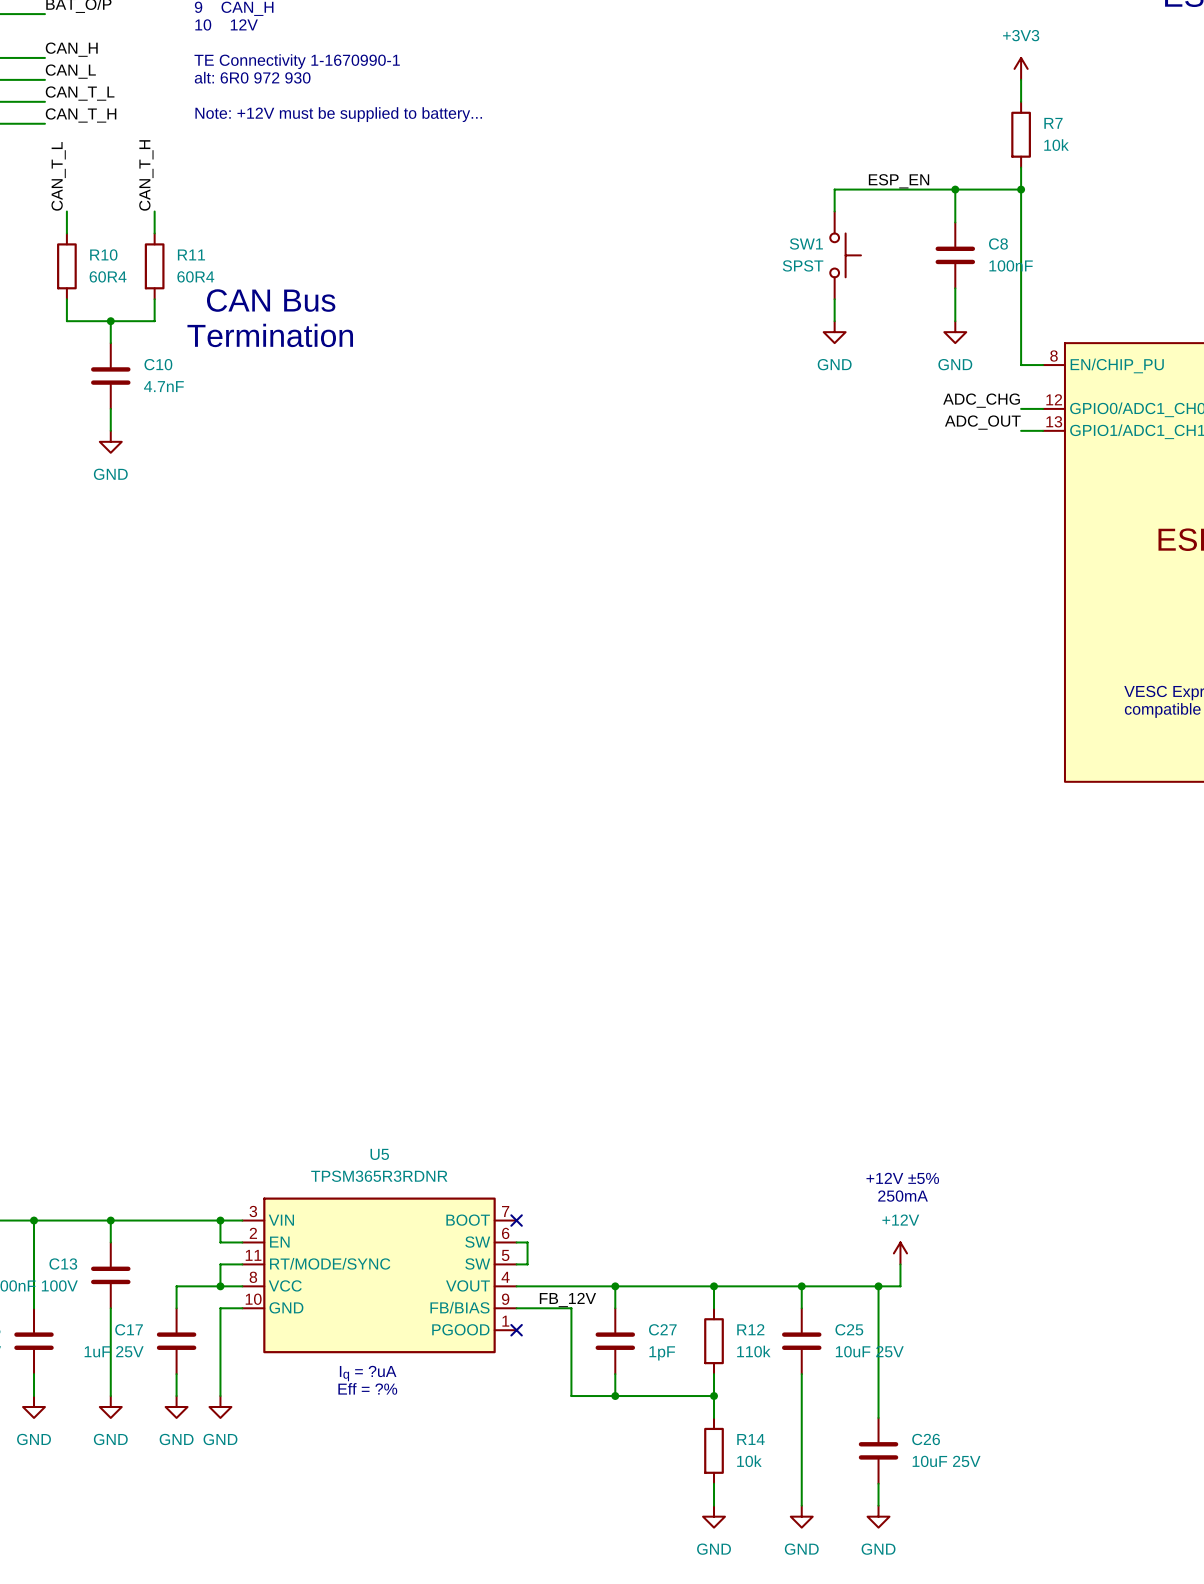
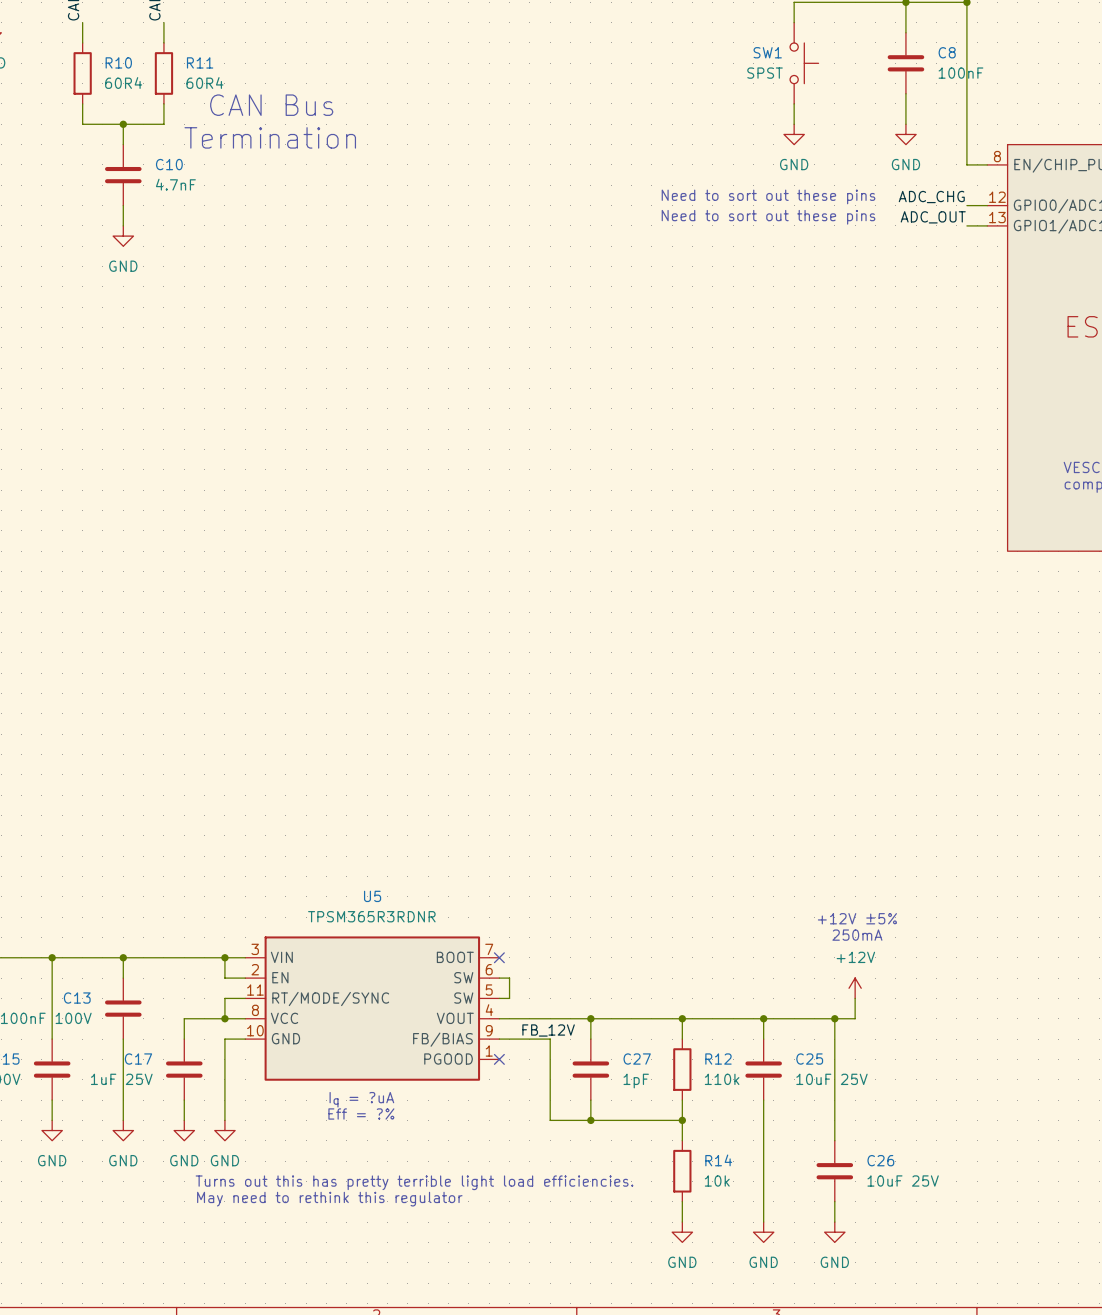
text: none -> Need to sort out these pins (768, 196)
text: none -> Need to sort out these pins (768, 217)
text: none -> Turns out this has pretty terrible light load efficiencies. (414, 1182)
text: none -> May need to rethink this regulator (329, 1199)

